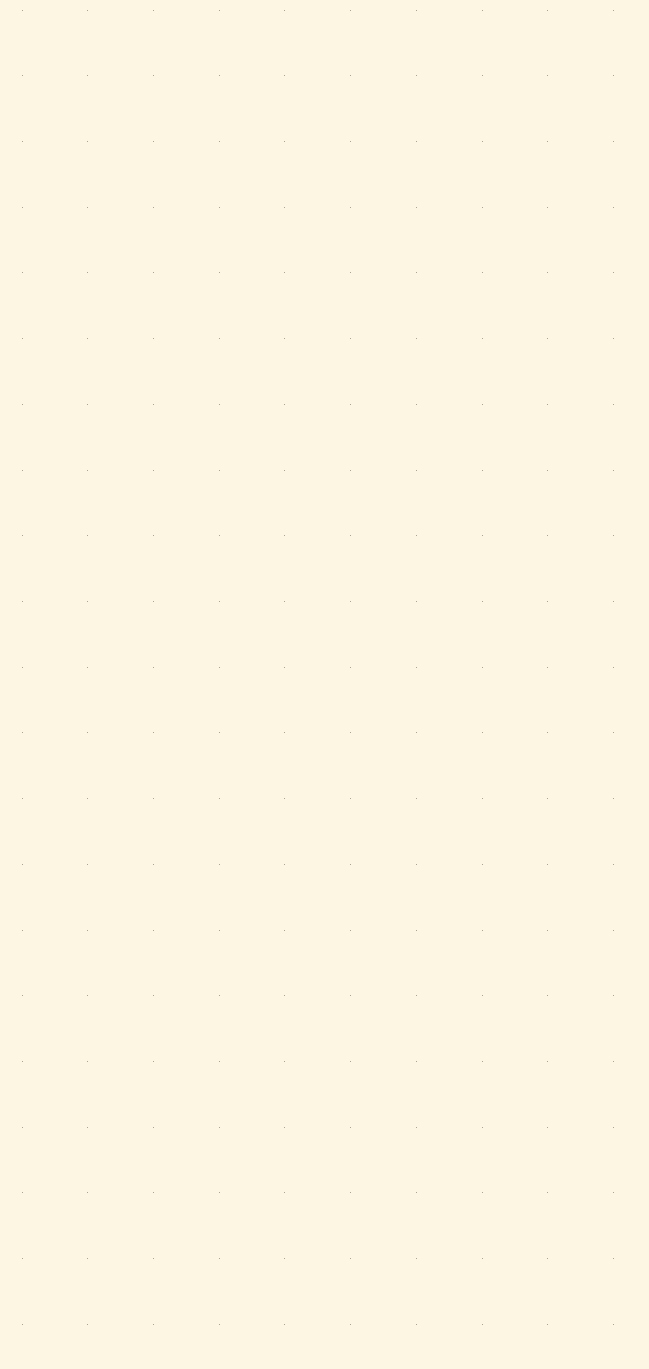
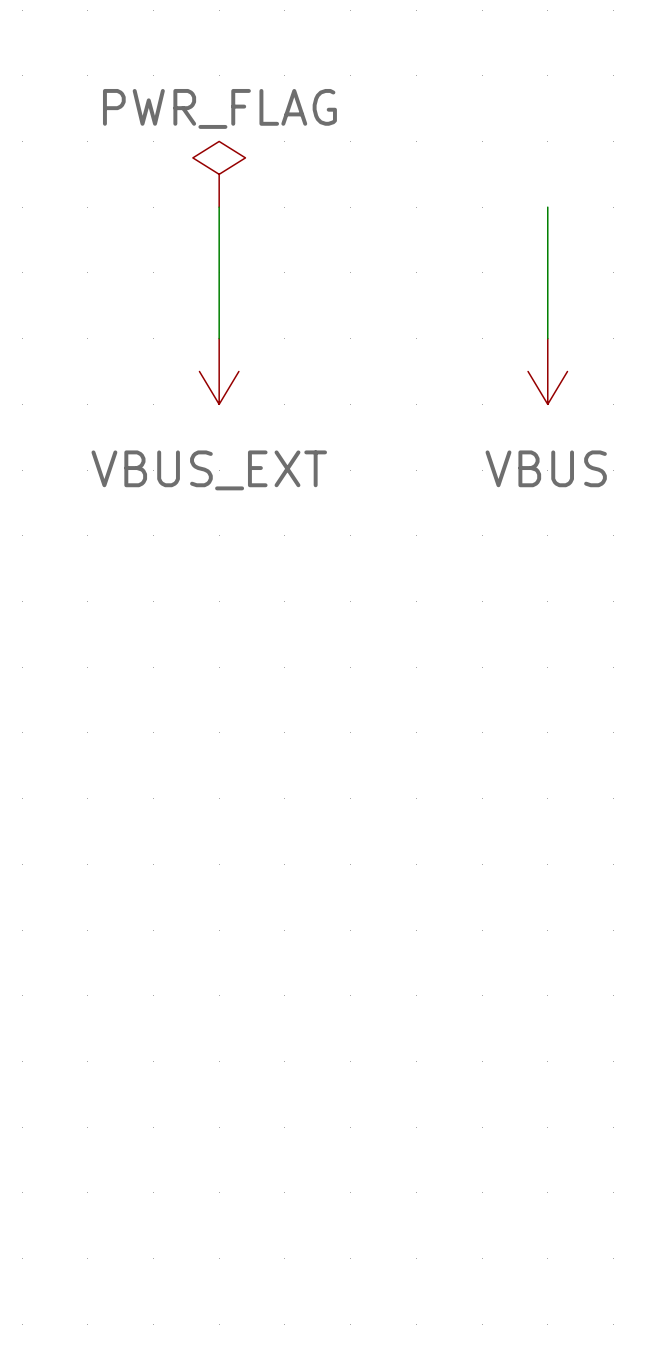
power symbol: none -> PWR_FLAG (219, 174)
wire: none -> (219, 207) (219, 338)
wire: none -> (547, 207) (547, 338)
power symbol: none -> VBUS_EXT (219, 371)
power symbol: none -> VBUS (547, 371)

